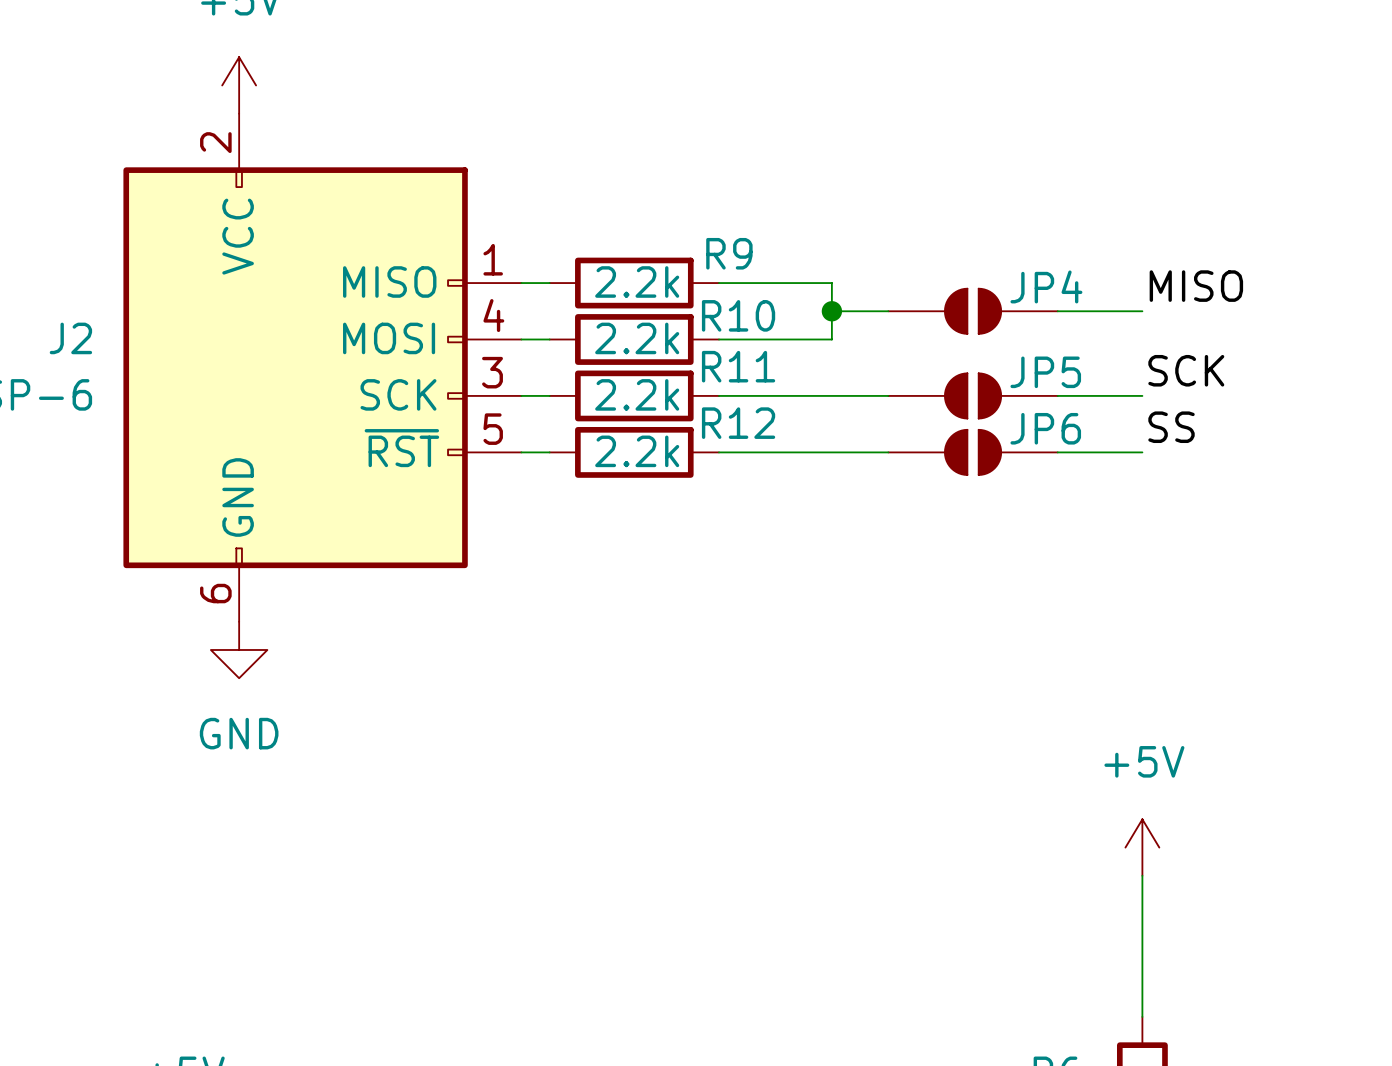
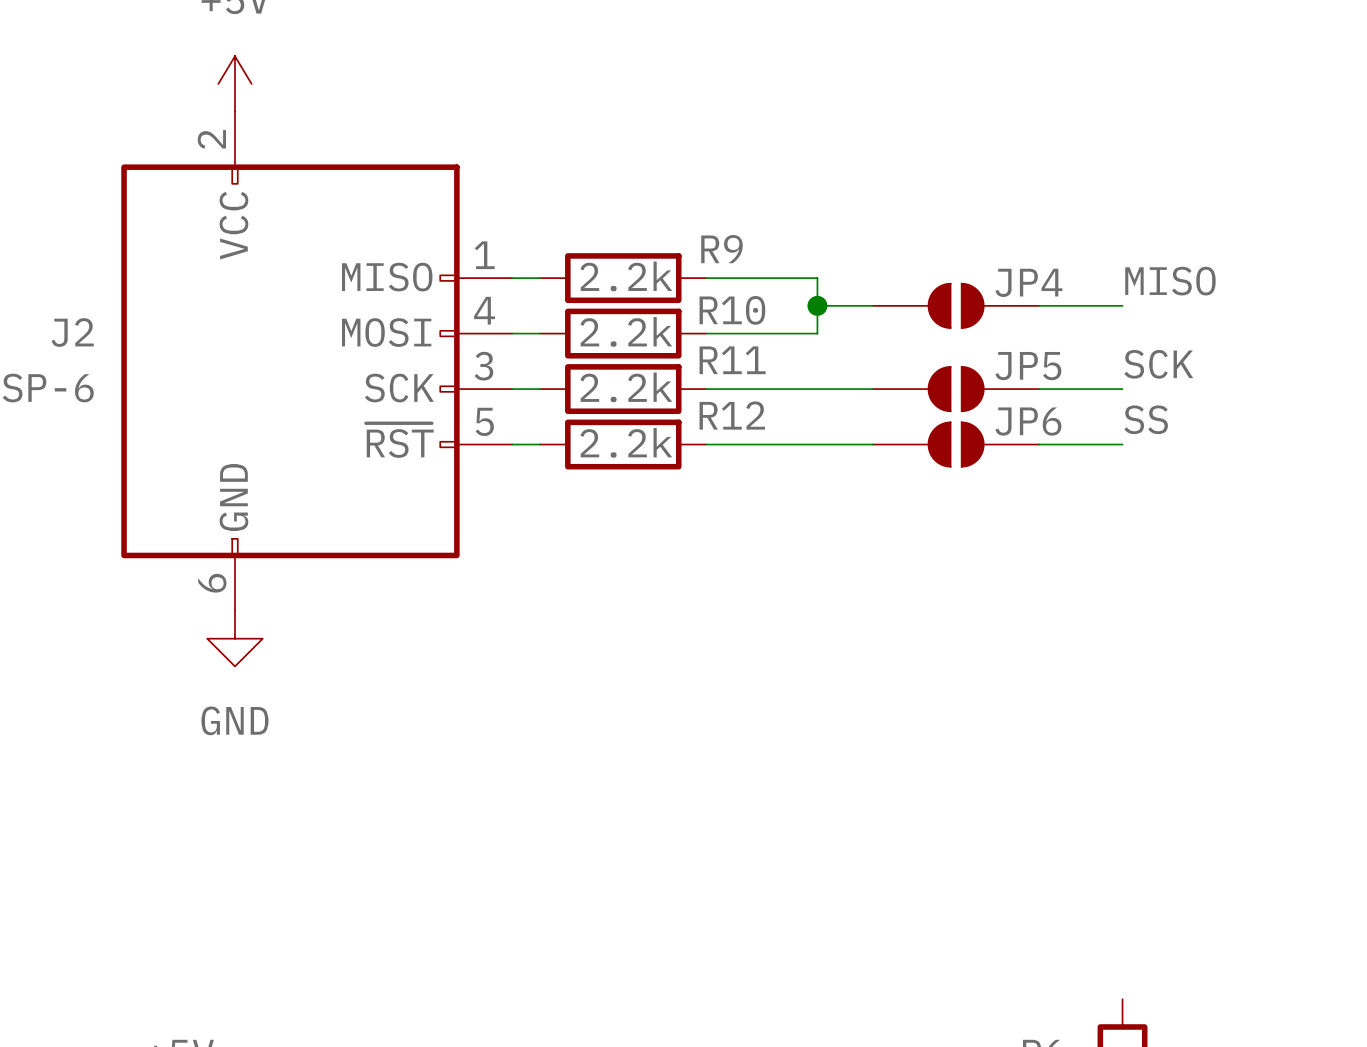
power symbol: +5V (1142, 847) -> none
wire: (1142, 875) (1142, 1016) -> none

